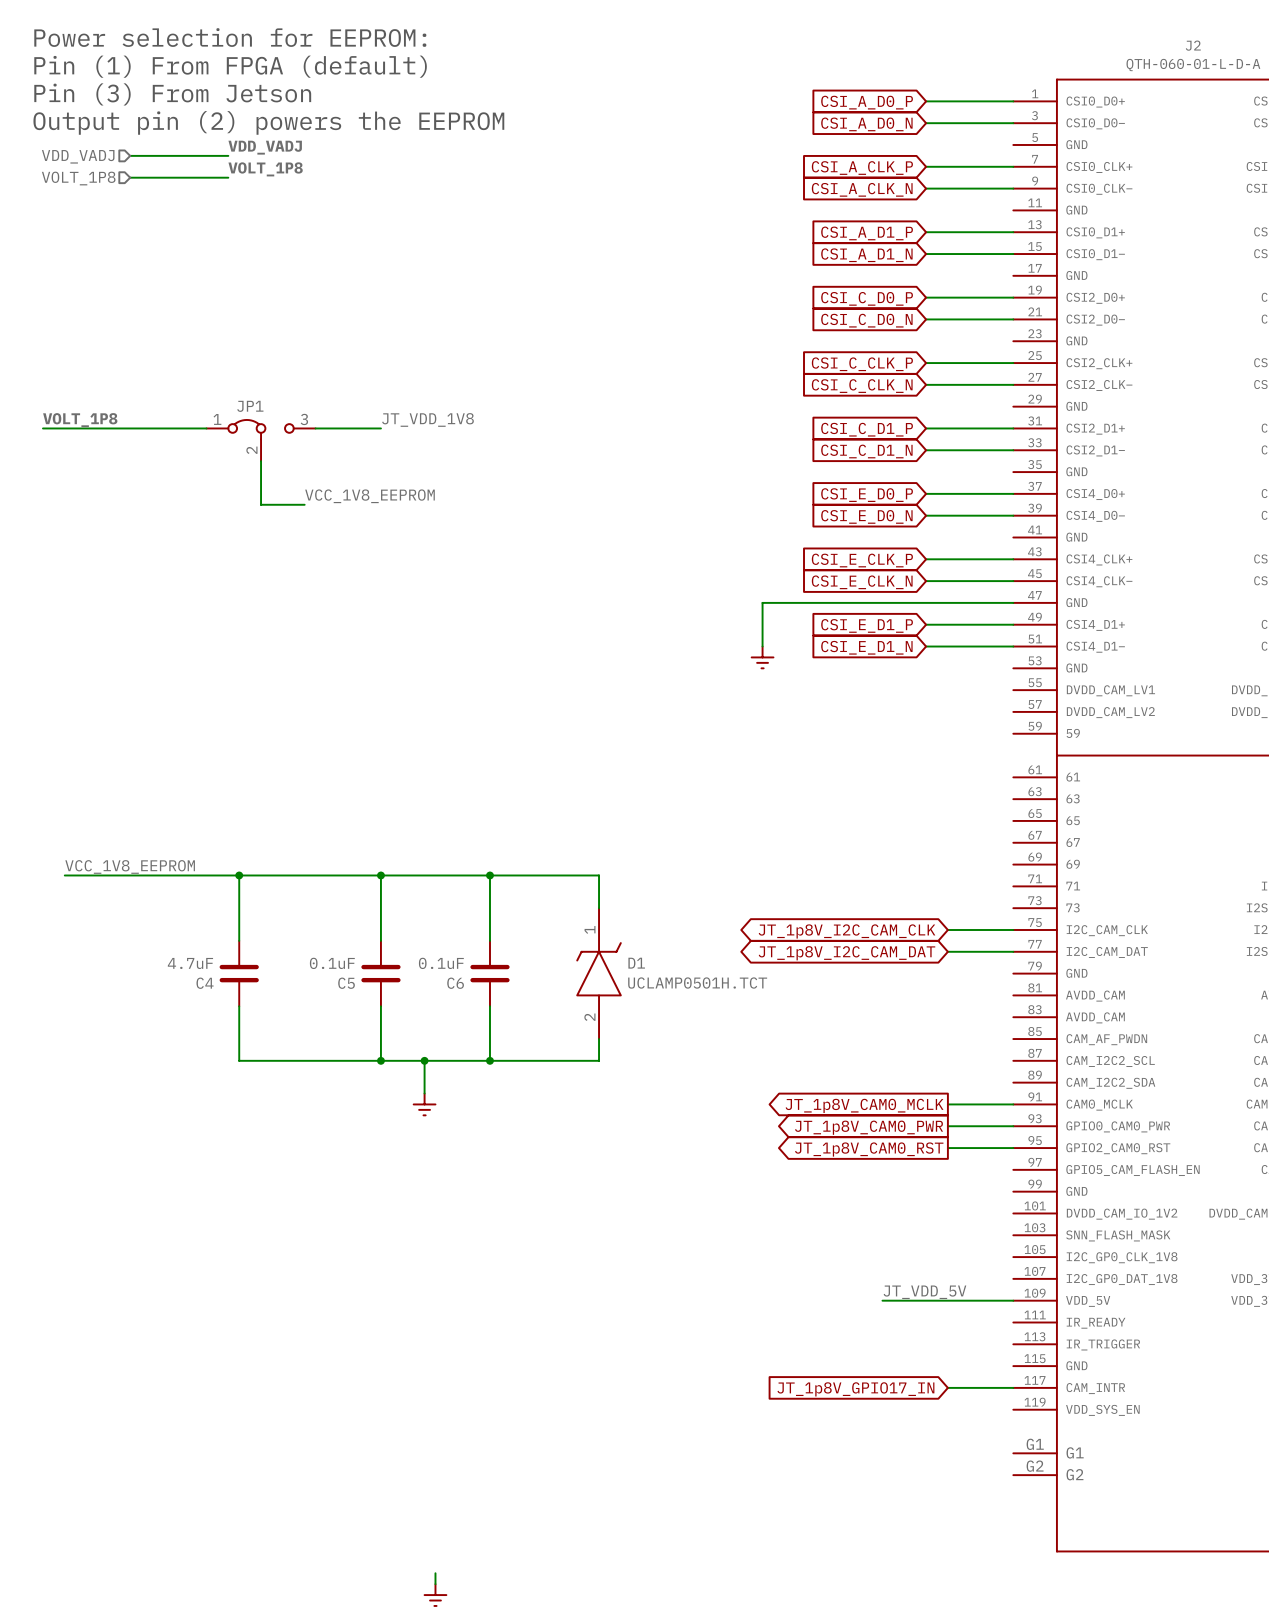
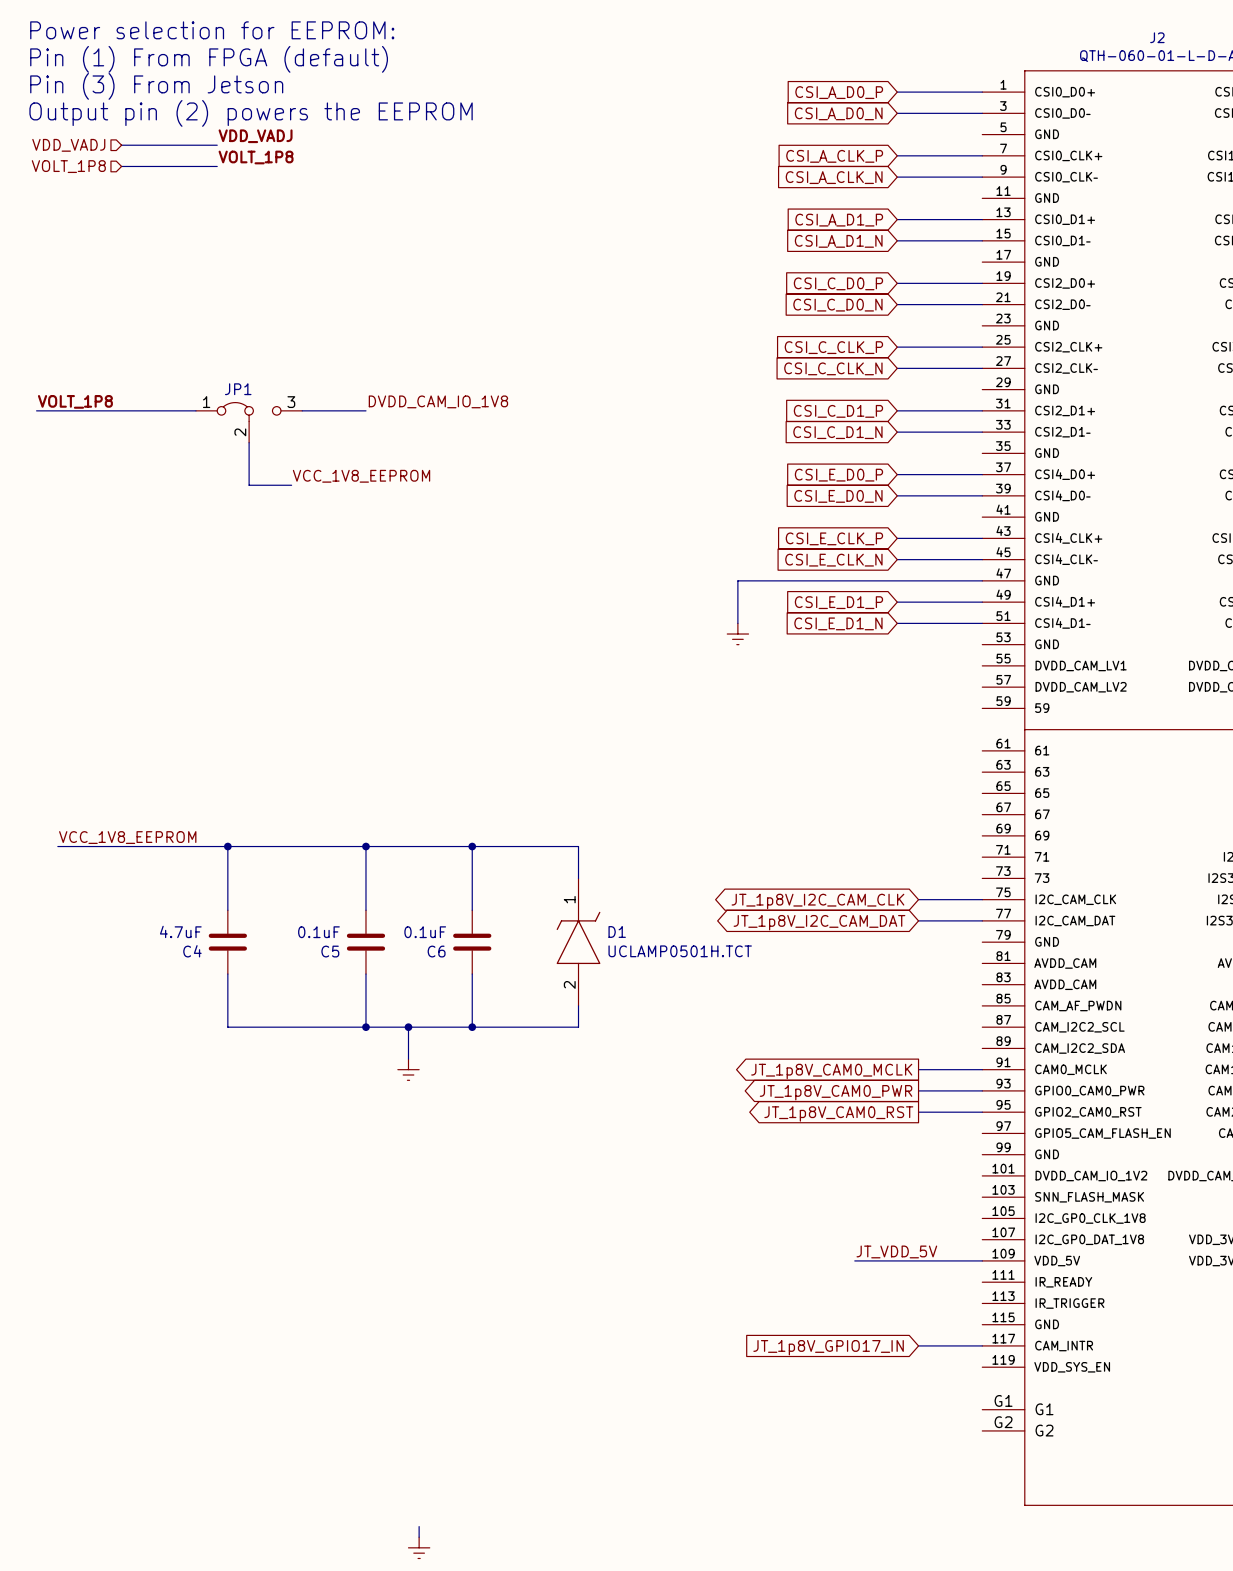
label: JT_VDD_1V8 (427, 419) -> DVDD_CAM_IO_1V8 (438, 401)

